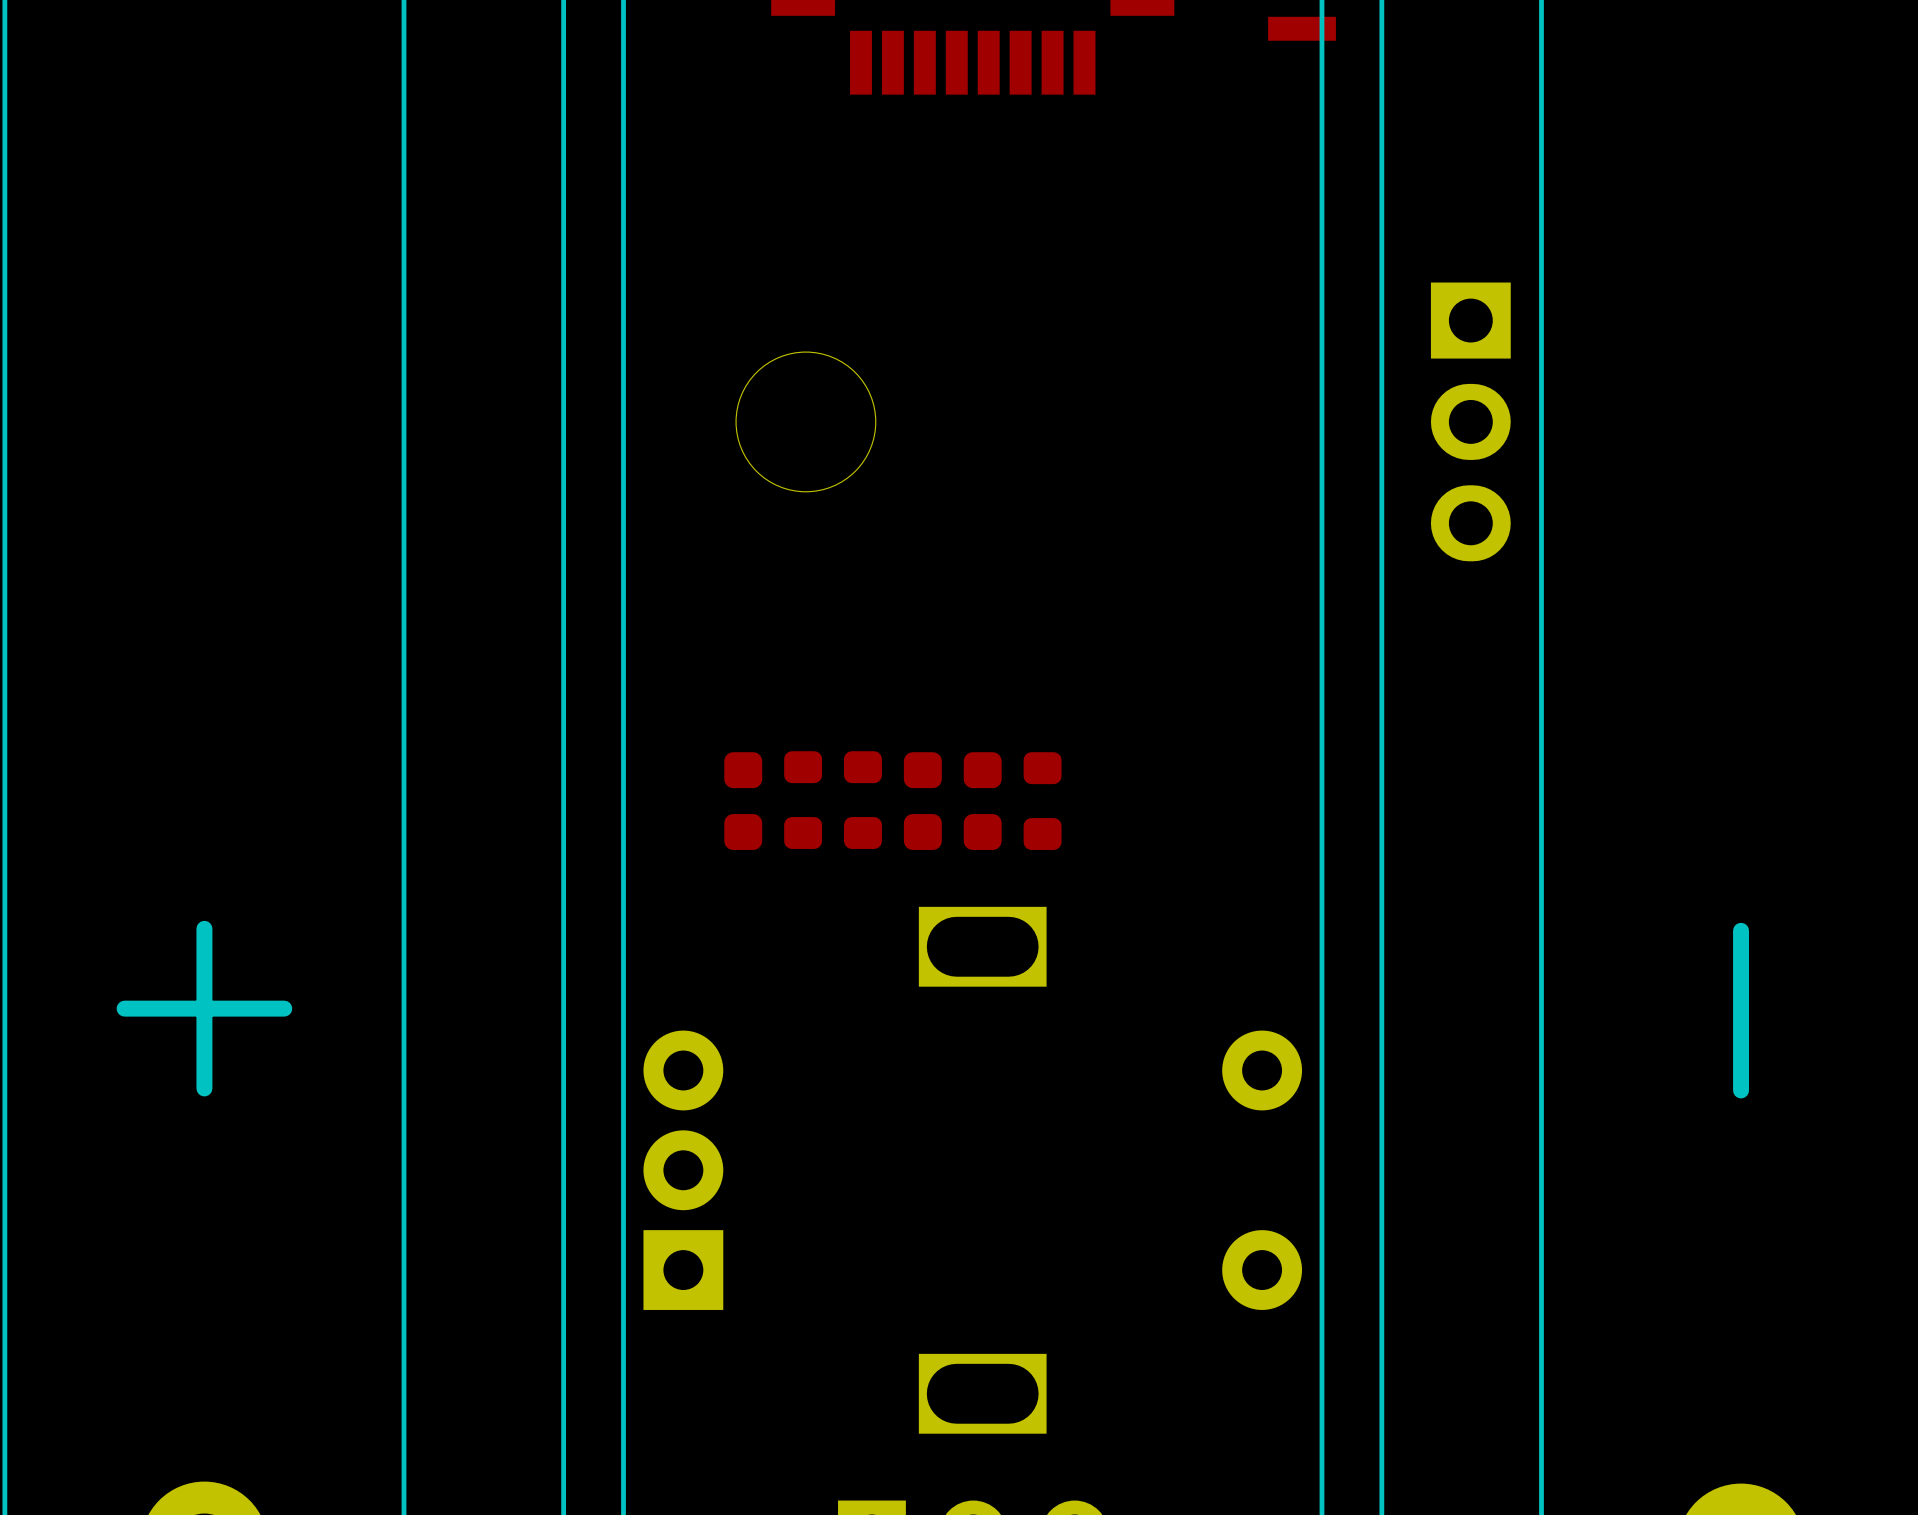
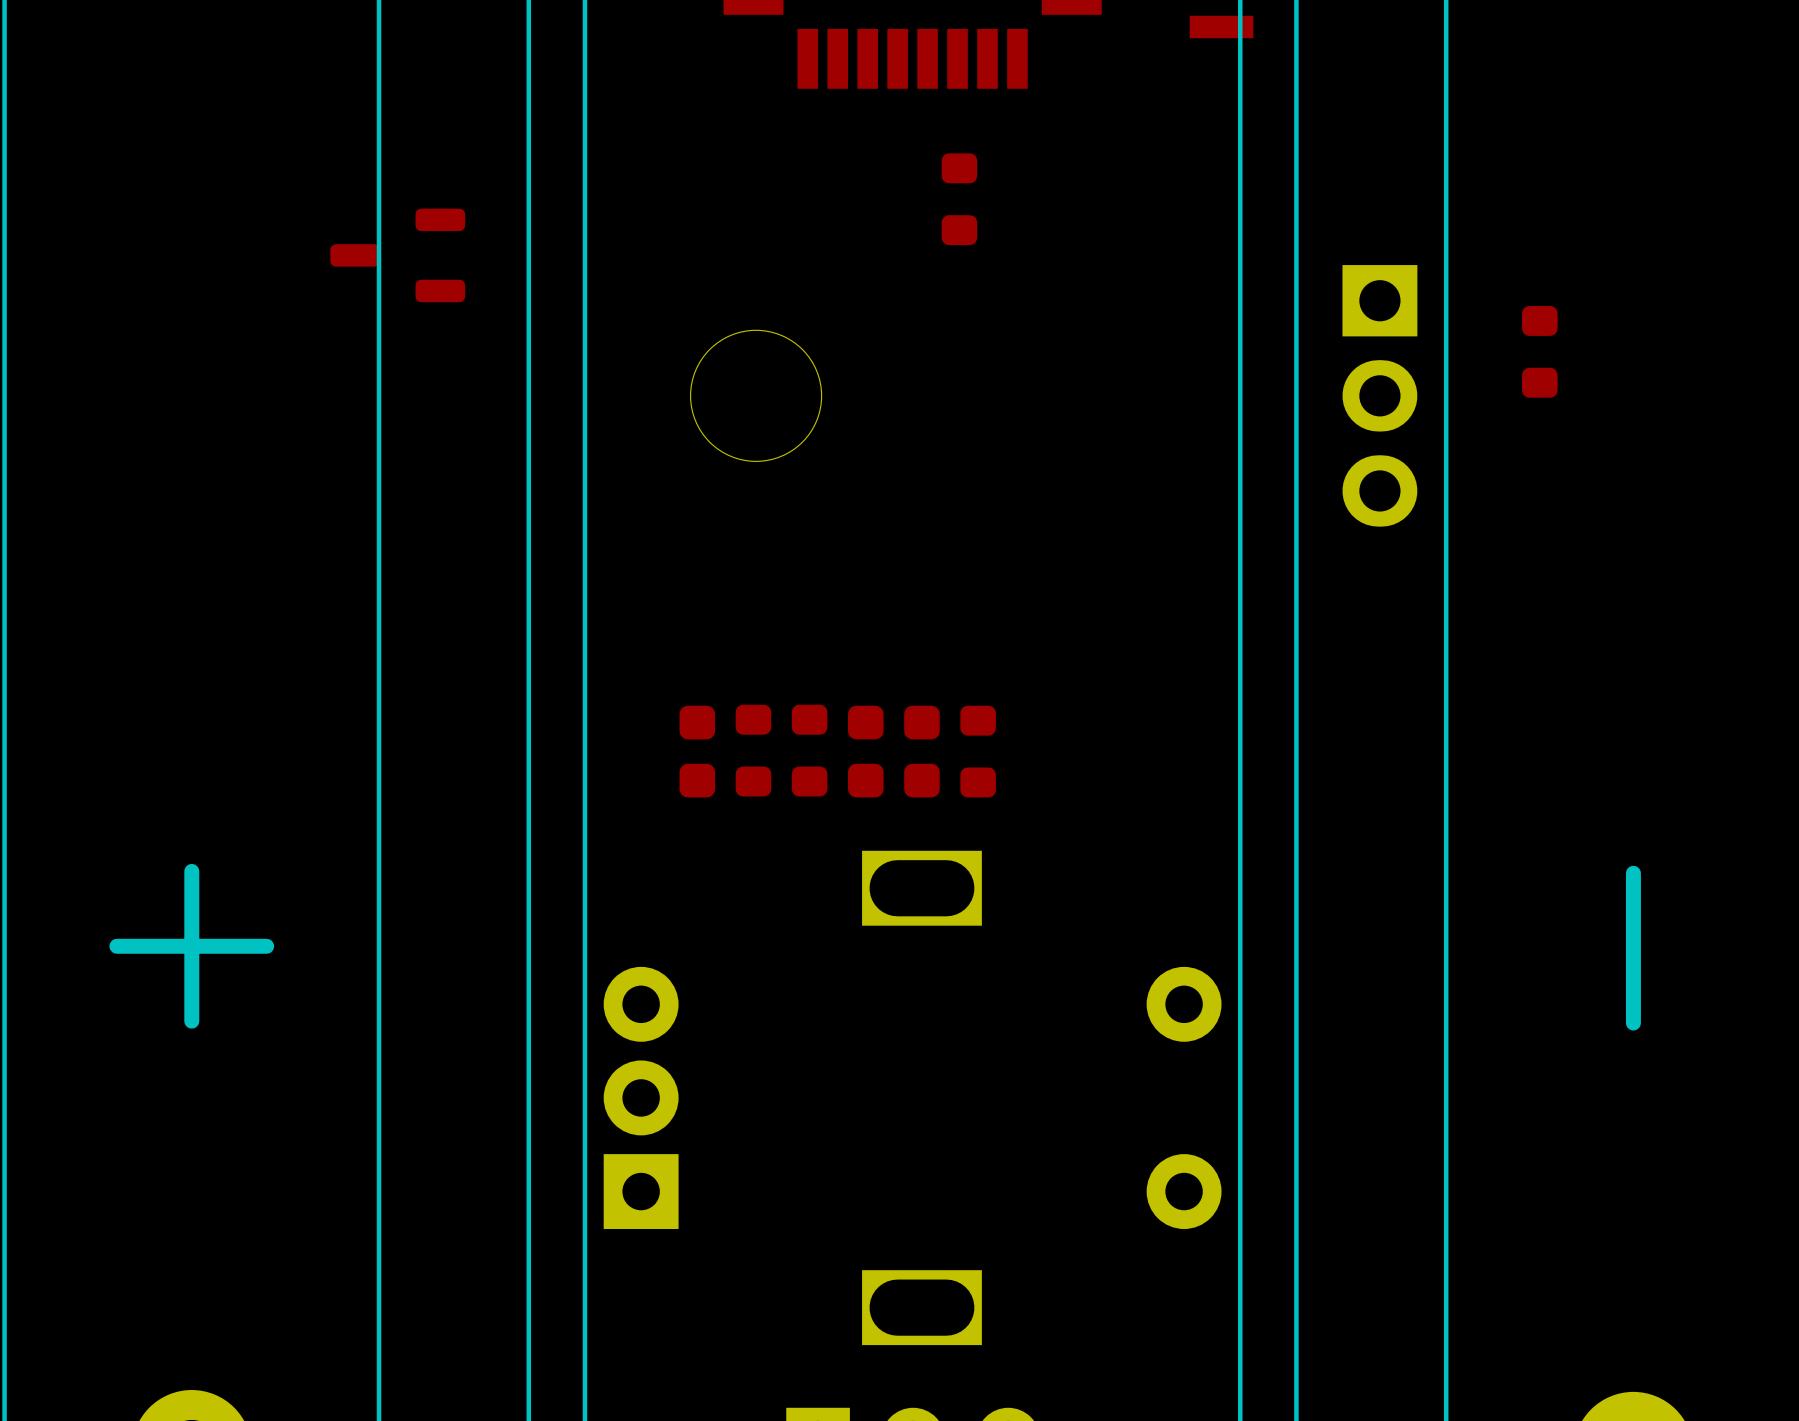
part: none -> (959, 199)
part: none -> (397, 255)
part: none -> (1539, 351)

